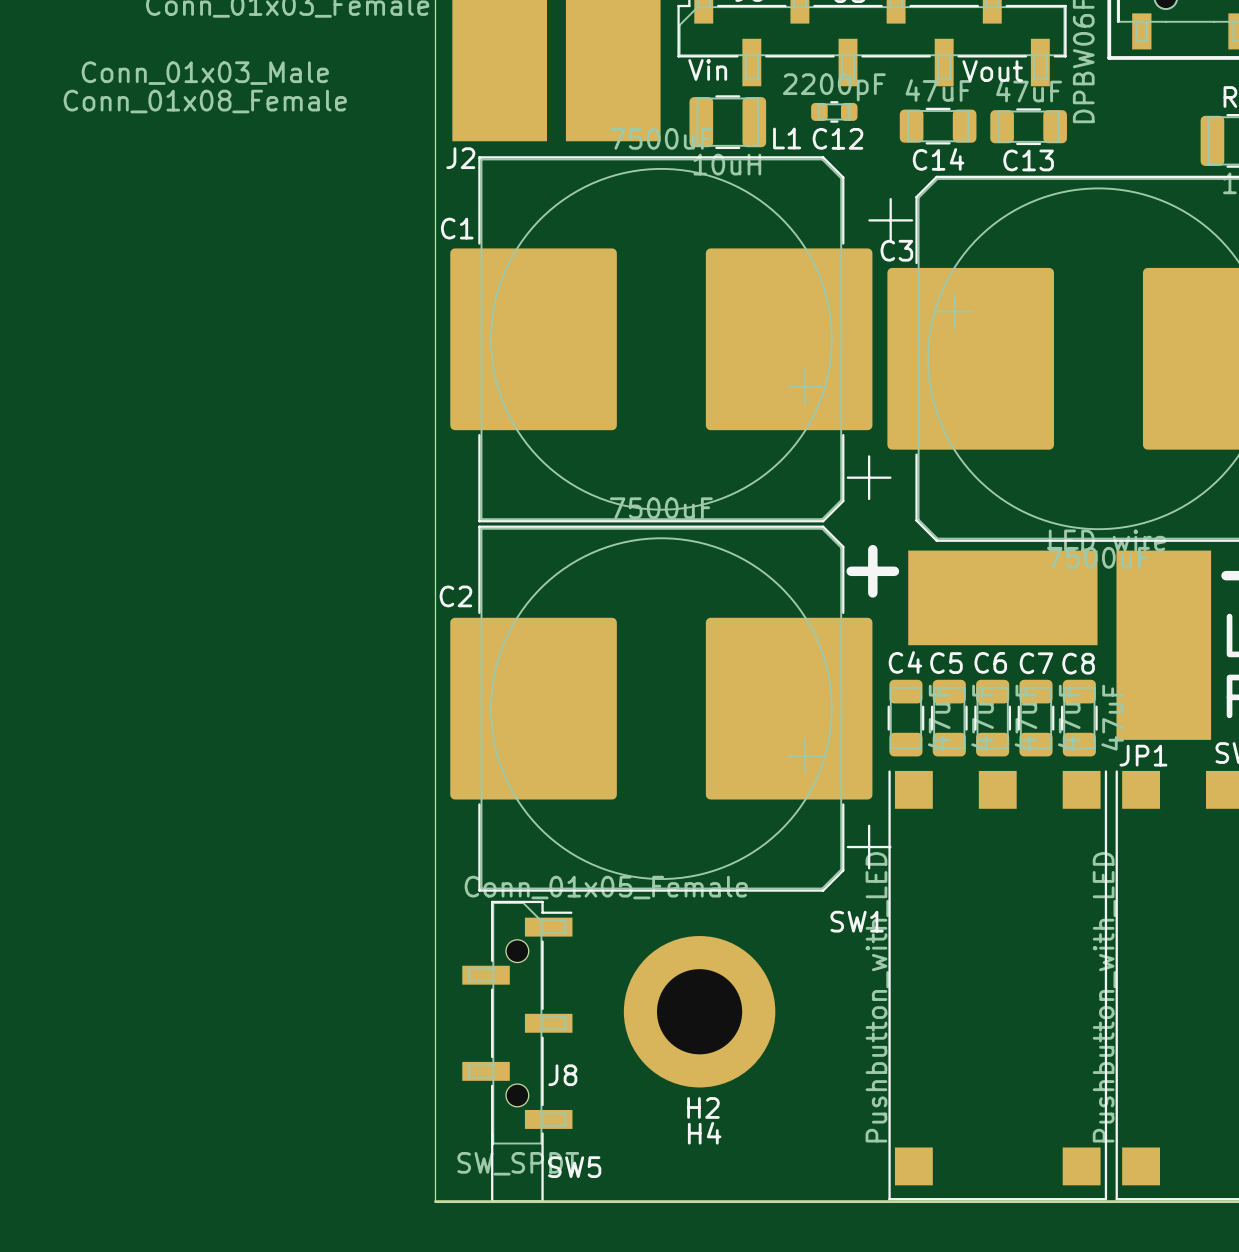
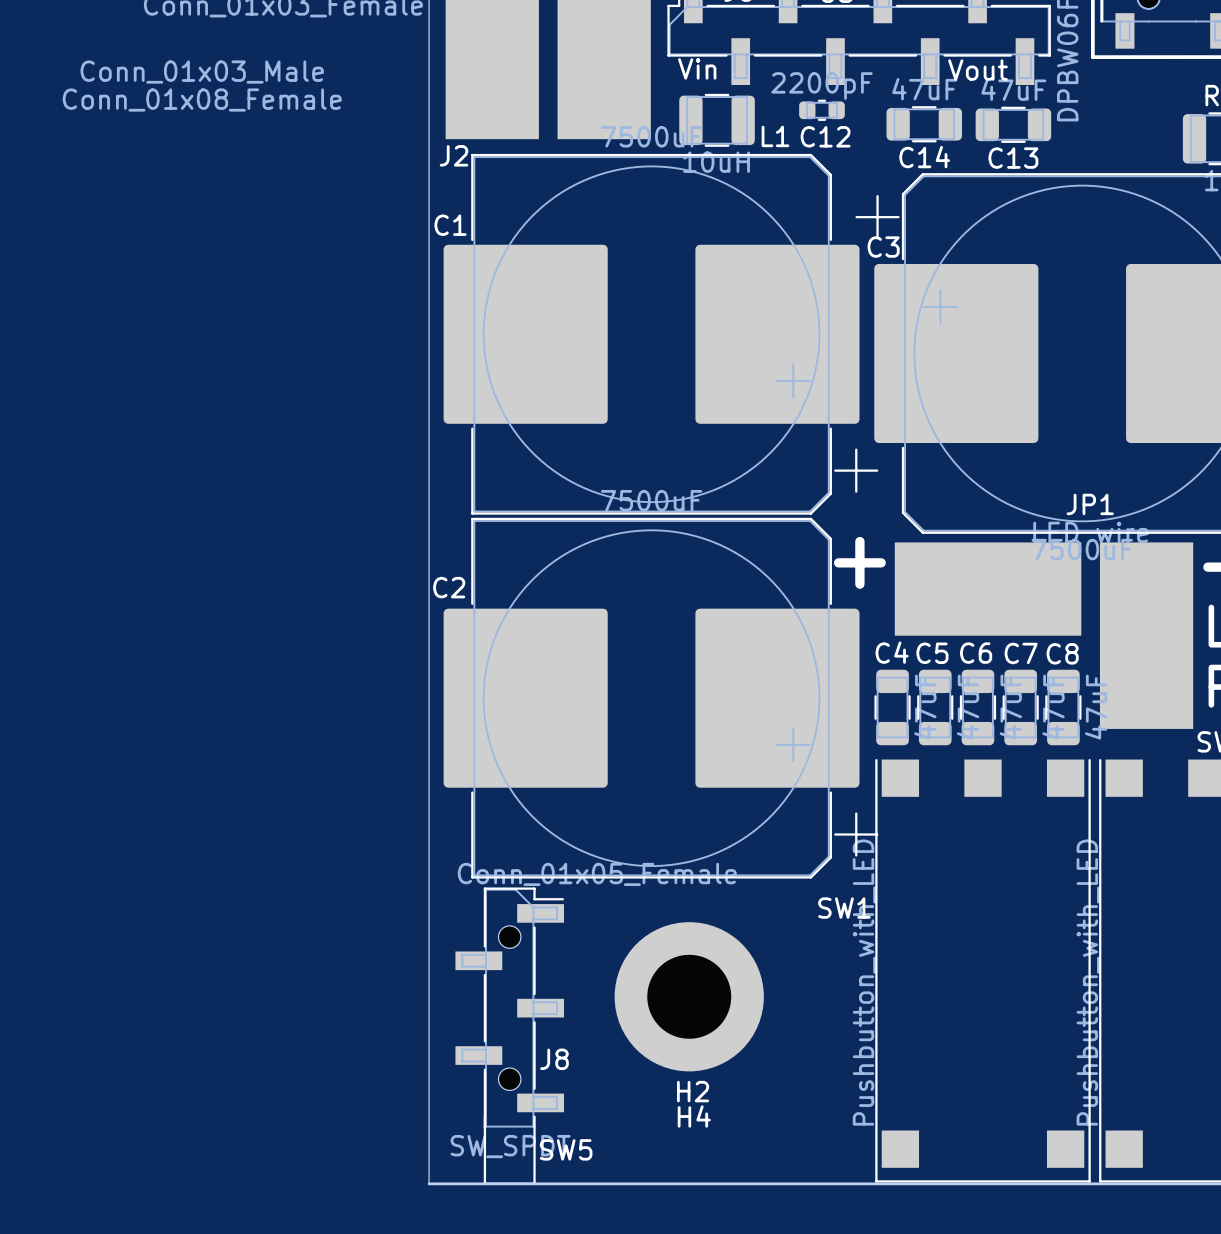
JP1 name position: JP1 (1143, 755) -> JP1 (1090, 504)

